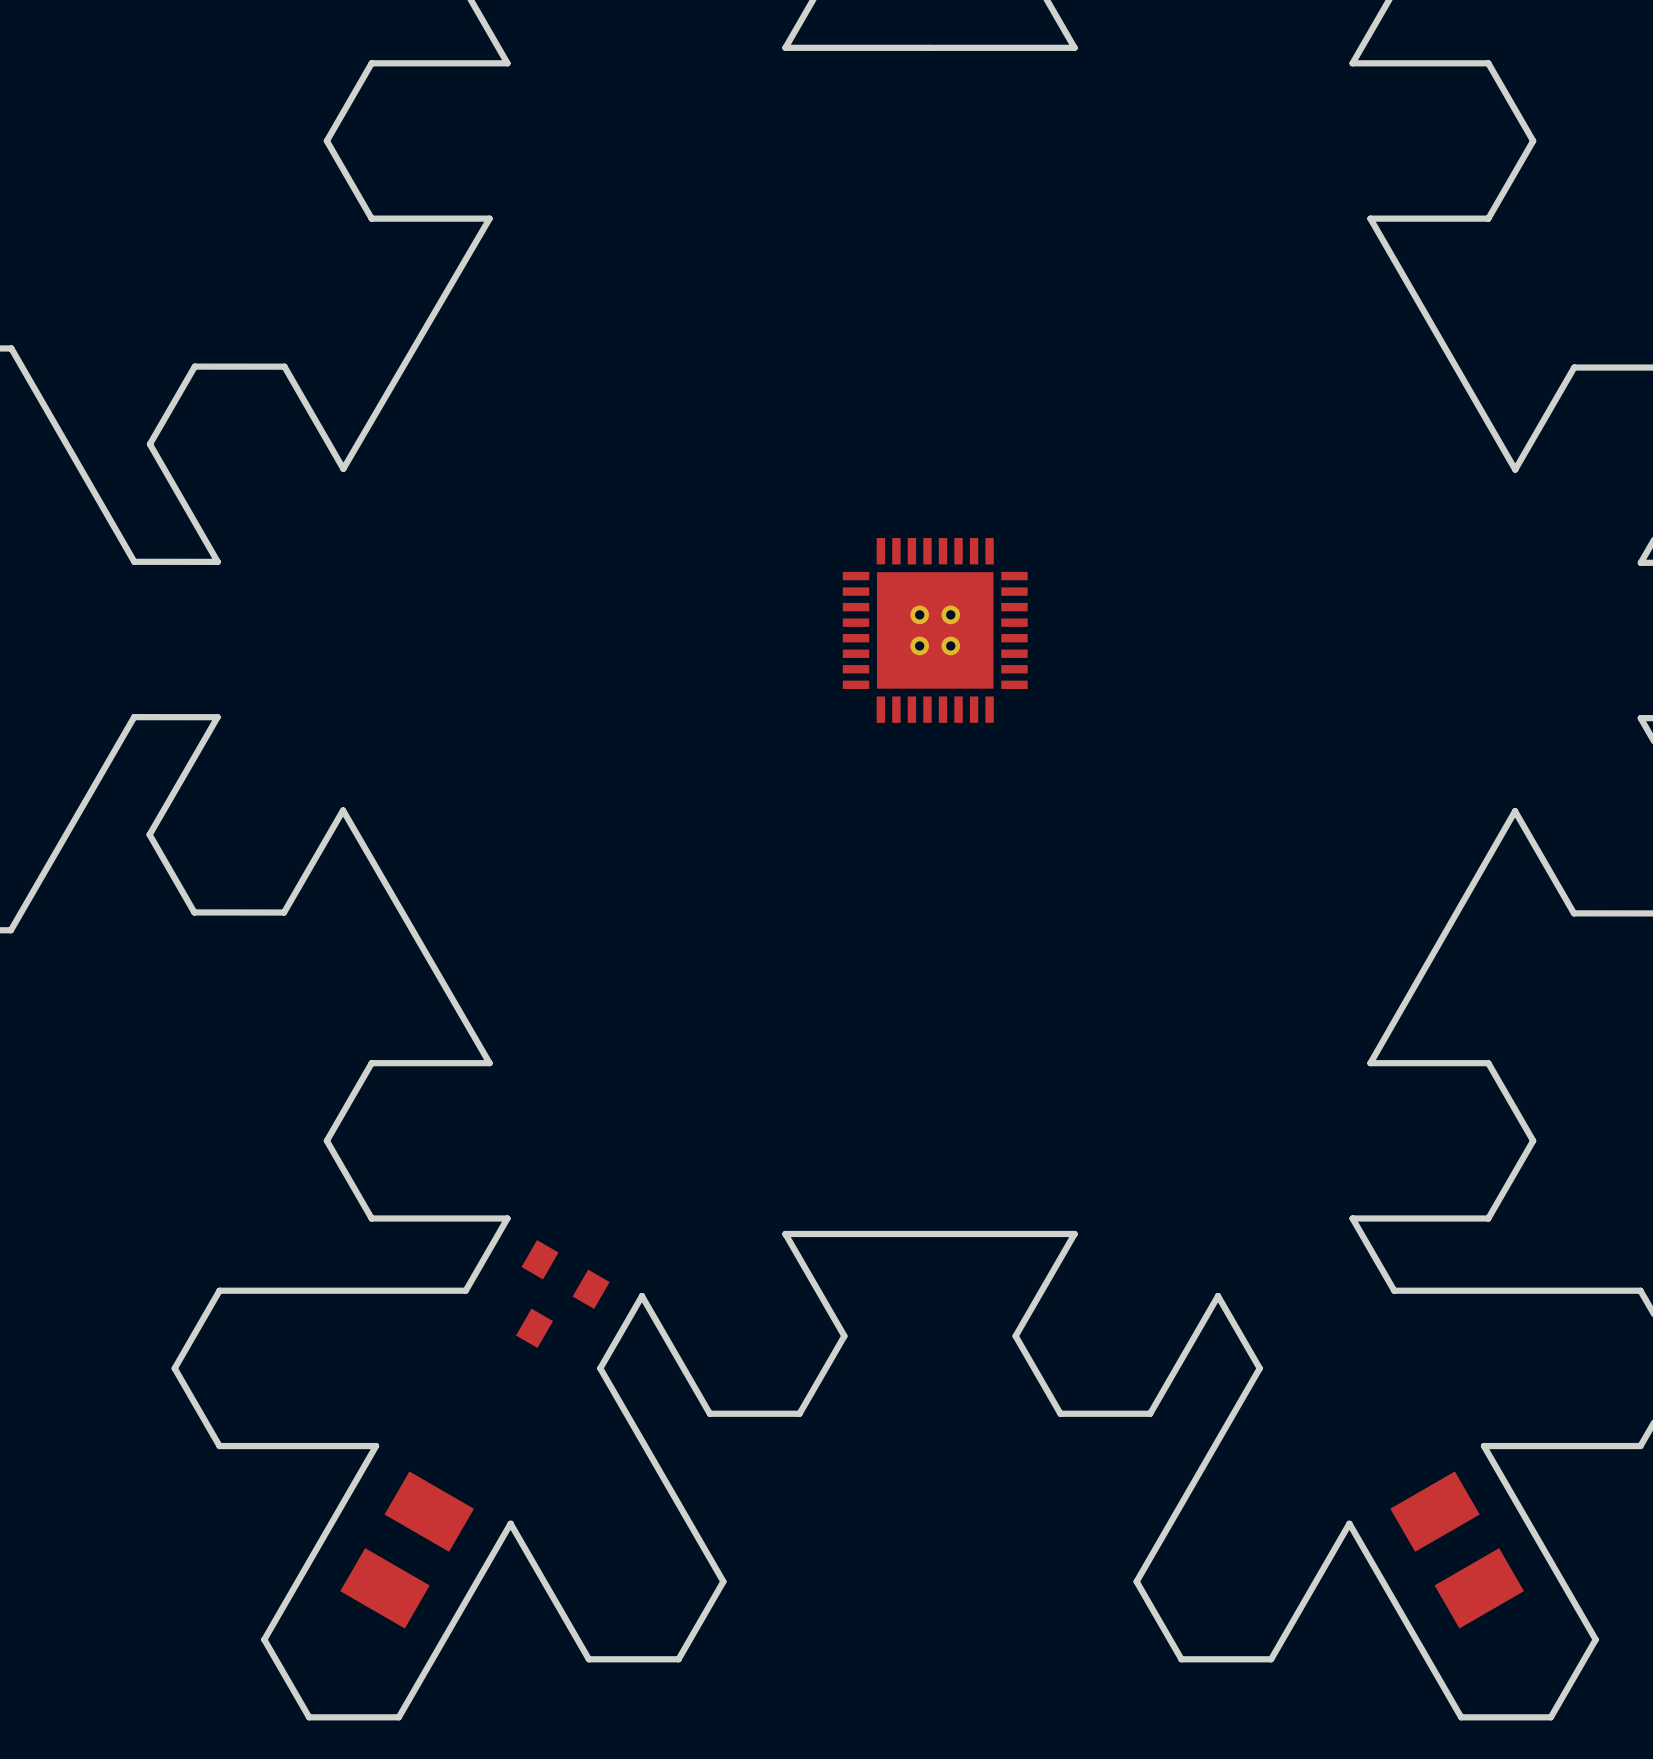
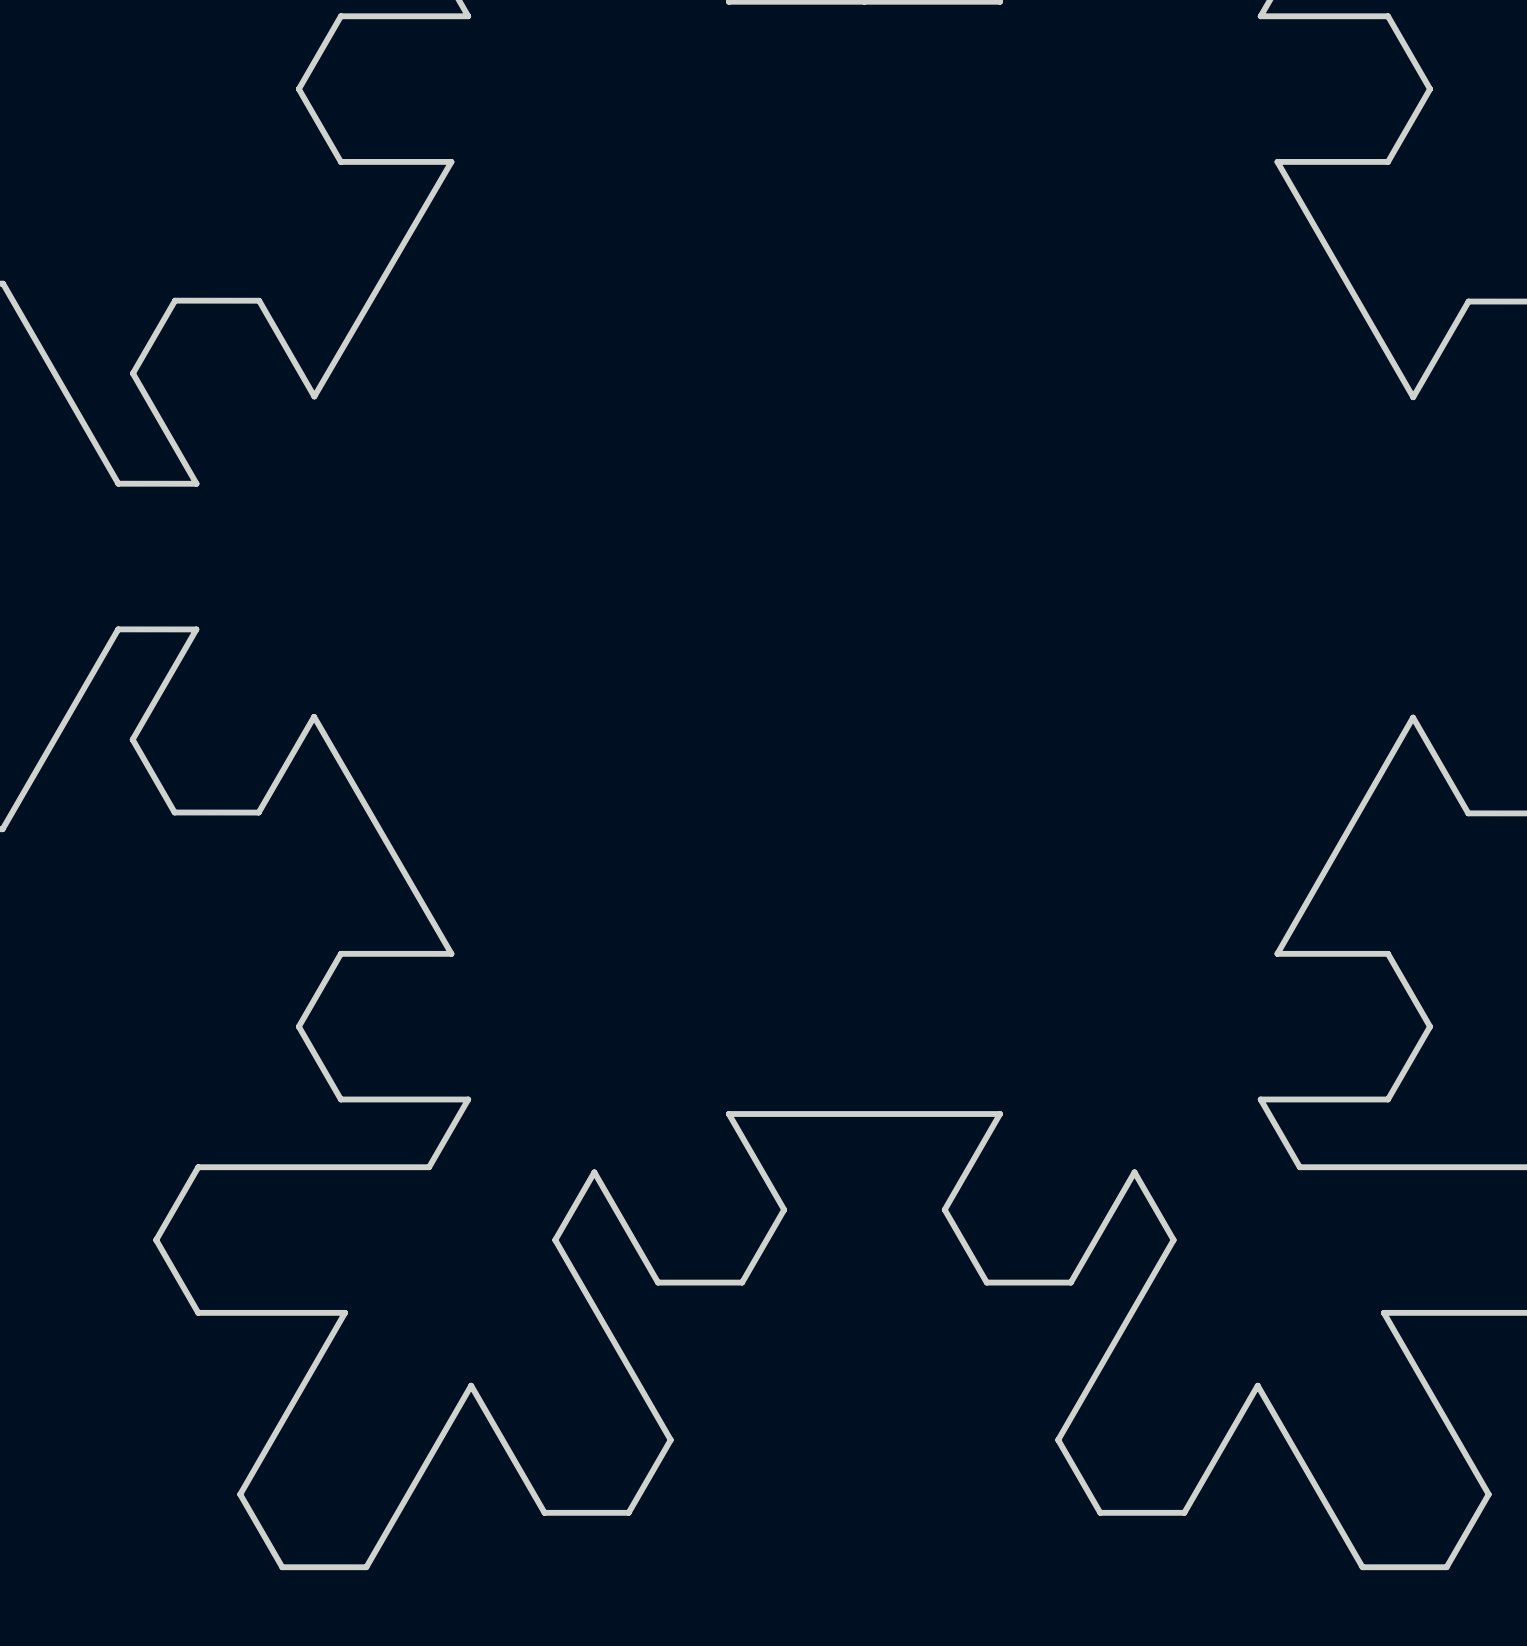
part: (935, 630) -> none
part: (562, 1294) -> none
part: (407, 1549) -> none
part: (1457, 1549) -> none

